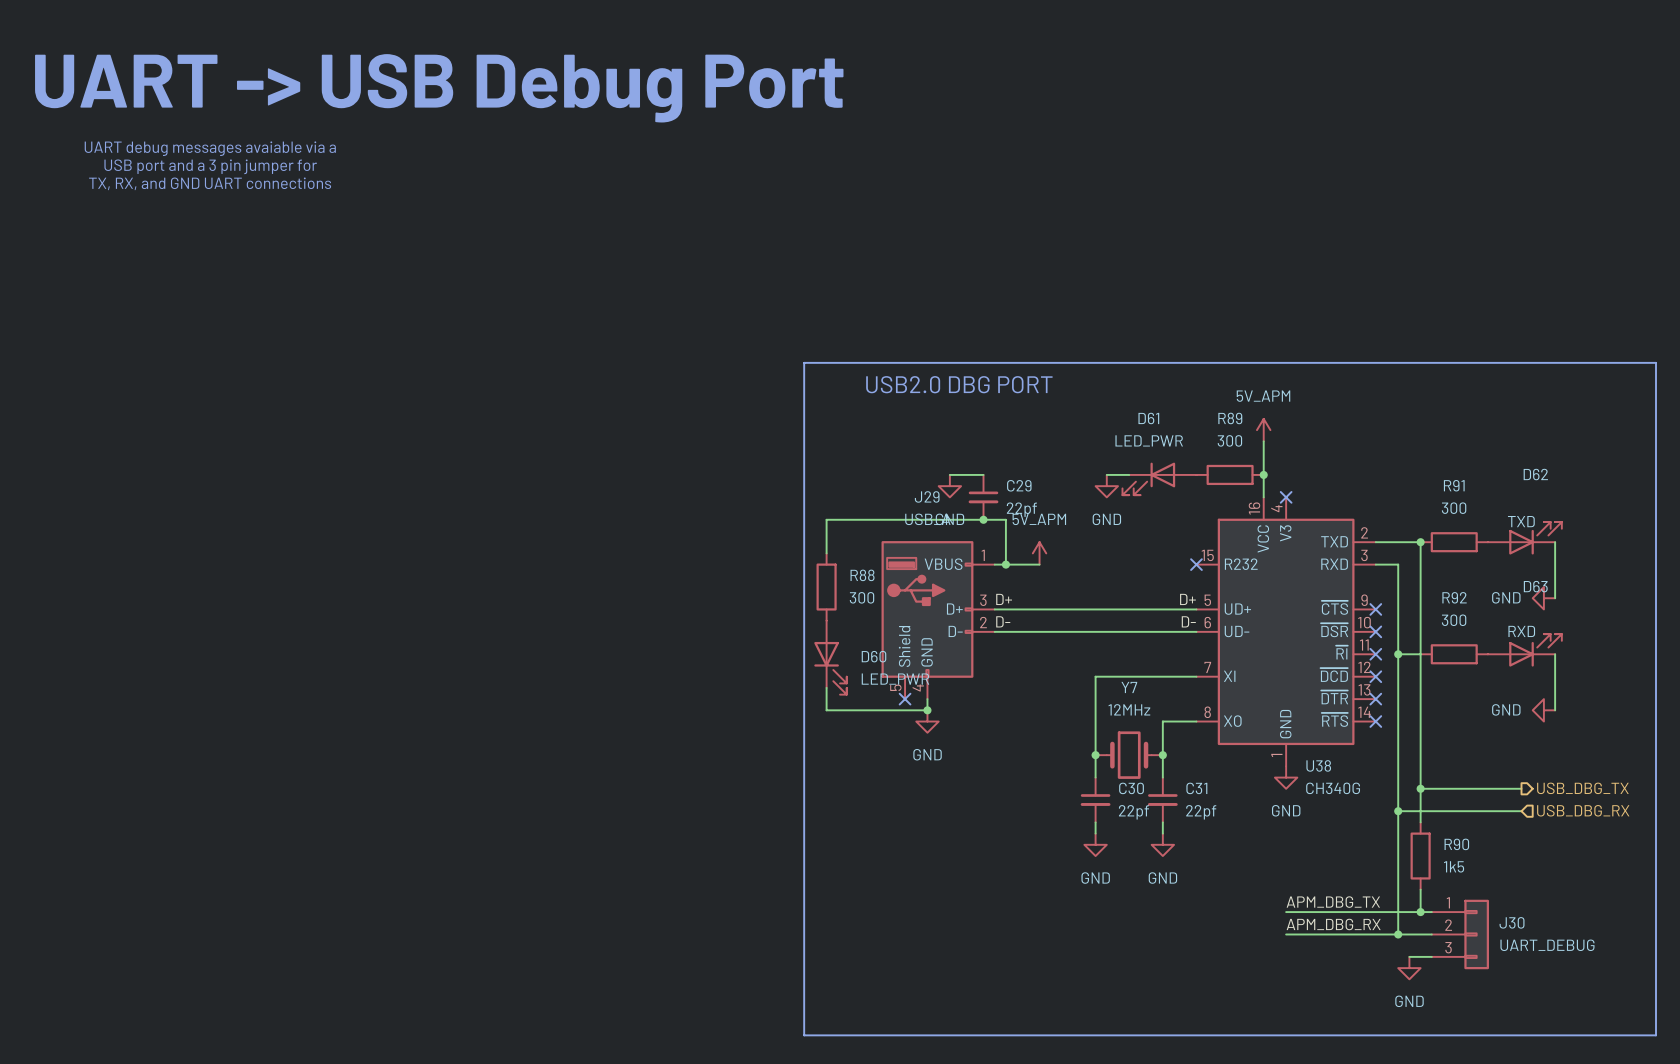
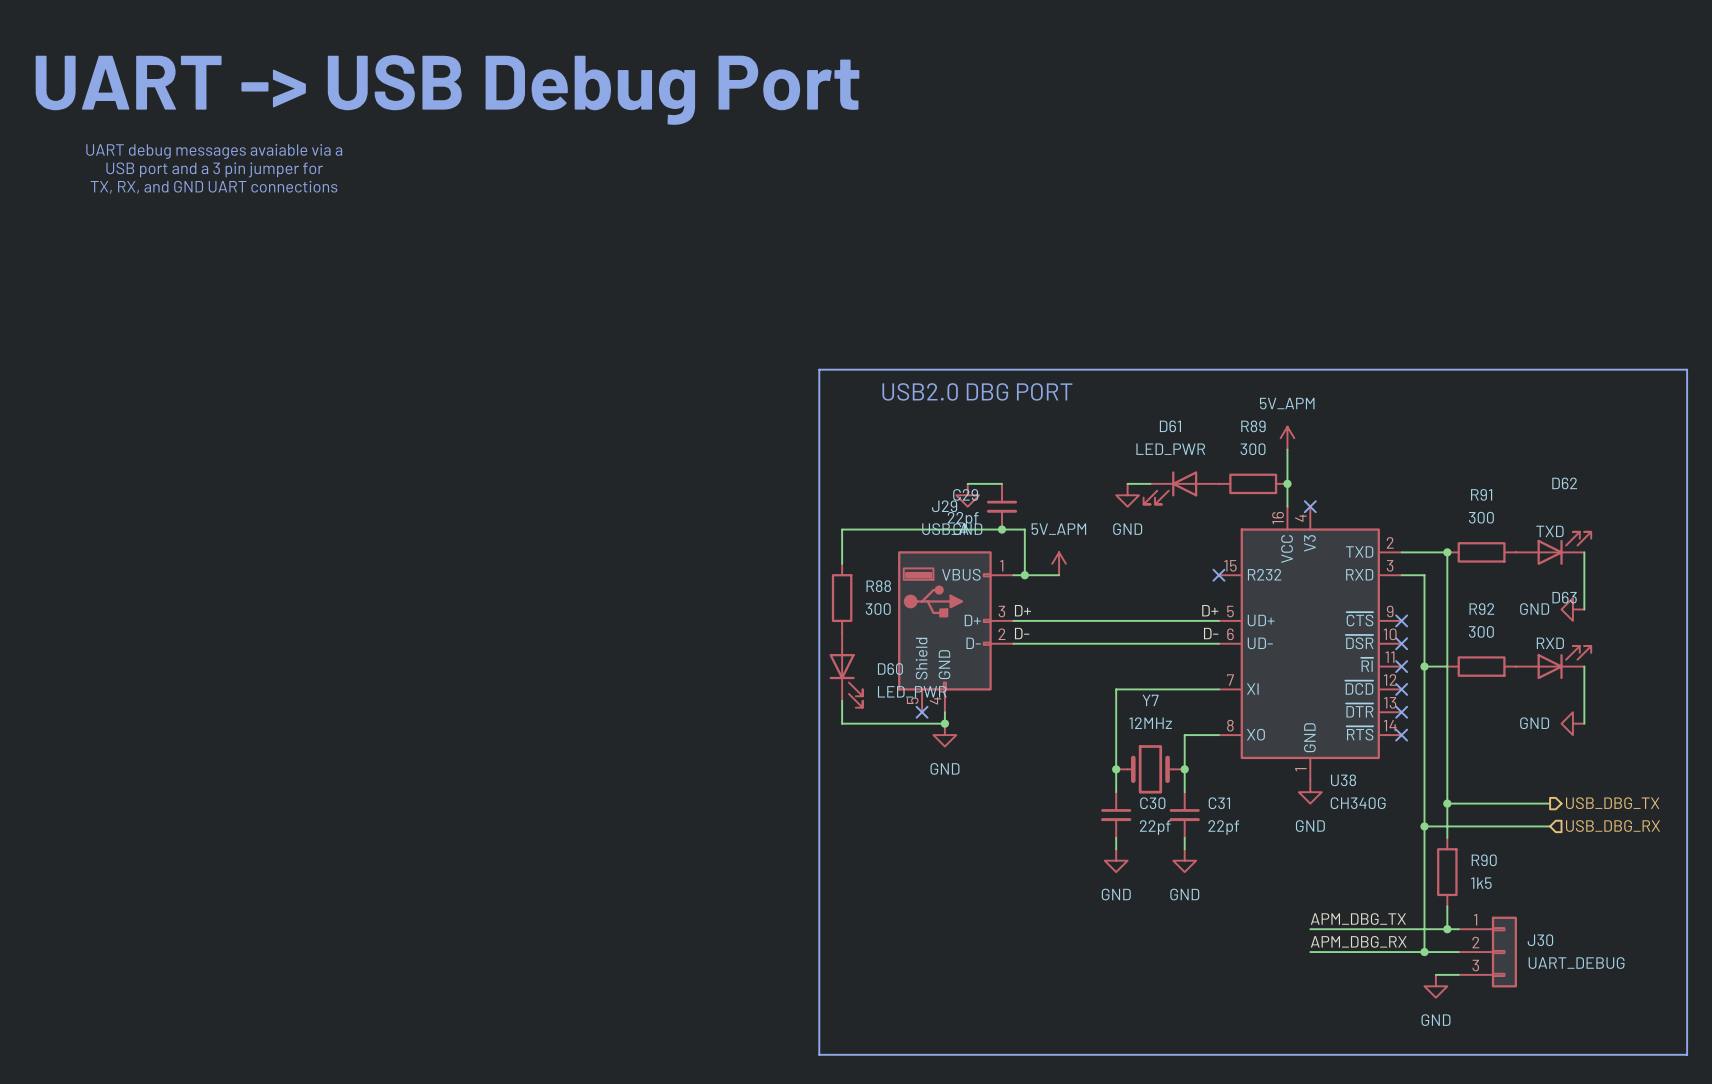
C29 name position: C29 (1019, 485) -> C29 (965, 494)
C29 value position: 22pf (1021, 509) -> 22pf (963, 519)

